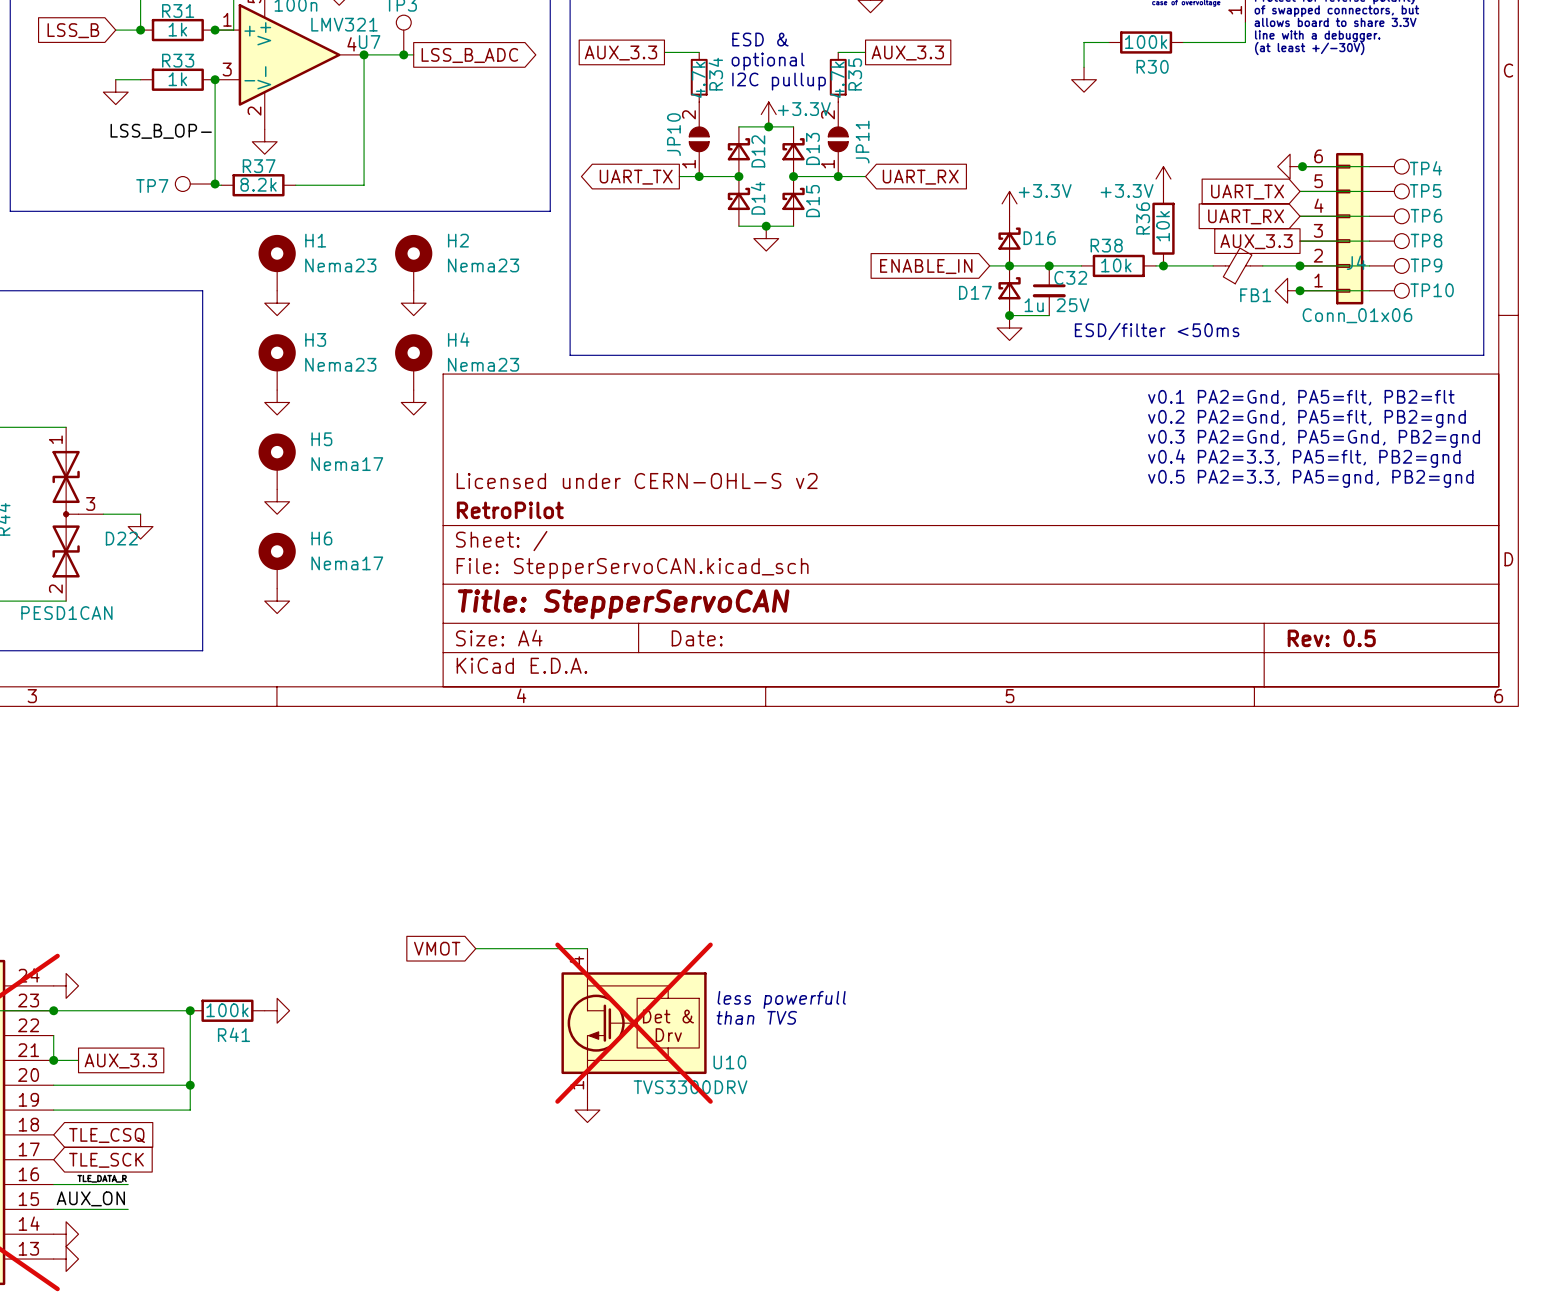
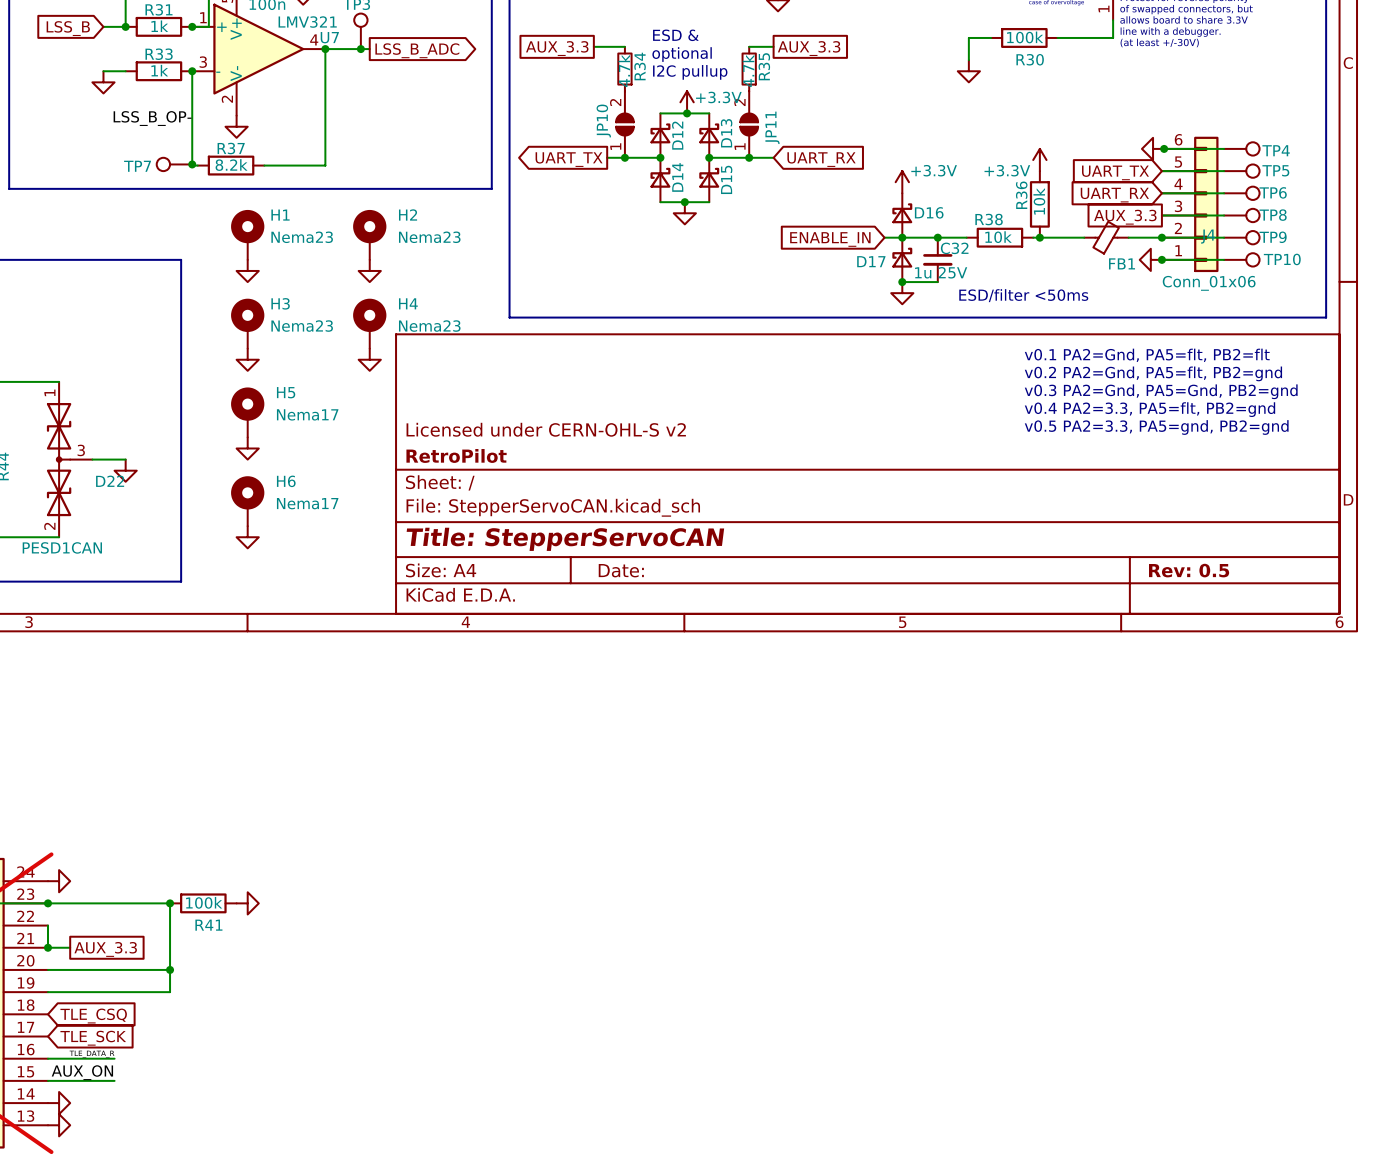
global label: VMOT (437, 948) -> none
wire: (475, 948) (587, 948) -> none
text: less powerfull (781, 999) -> none
text: than TVS (756, 1017) -> none
U10: TVS3300DRV (634, 1023) -> none
power symbol: (587, 1110) -> none

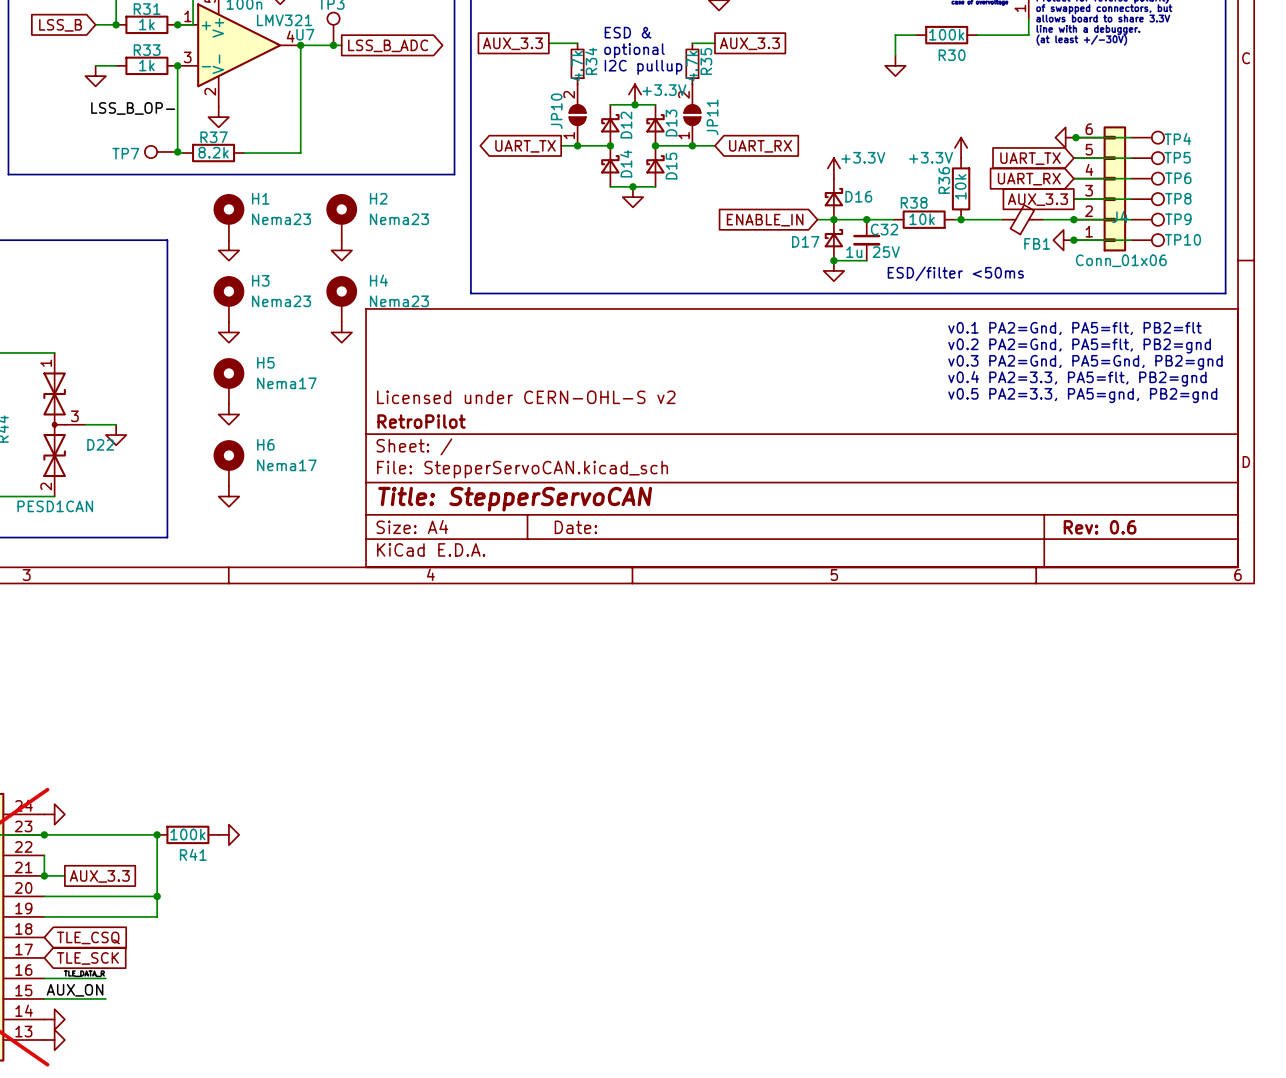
title block: Rev: 0.5 (1189, 570) -> Rev: 0.6 (1100, 527)

